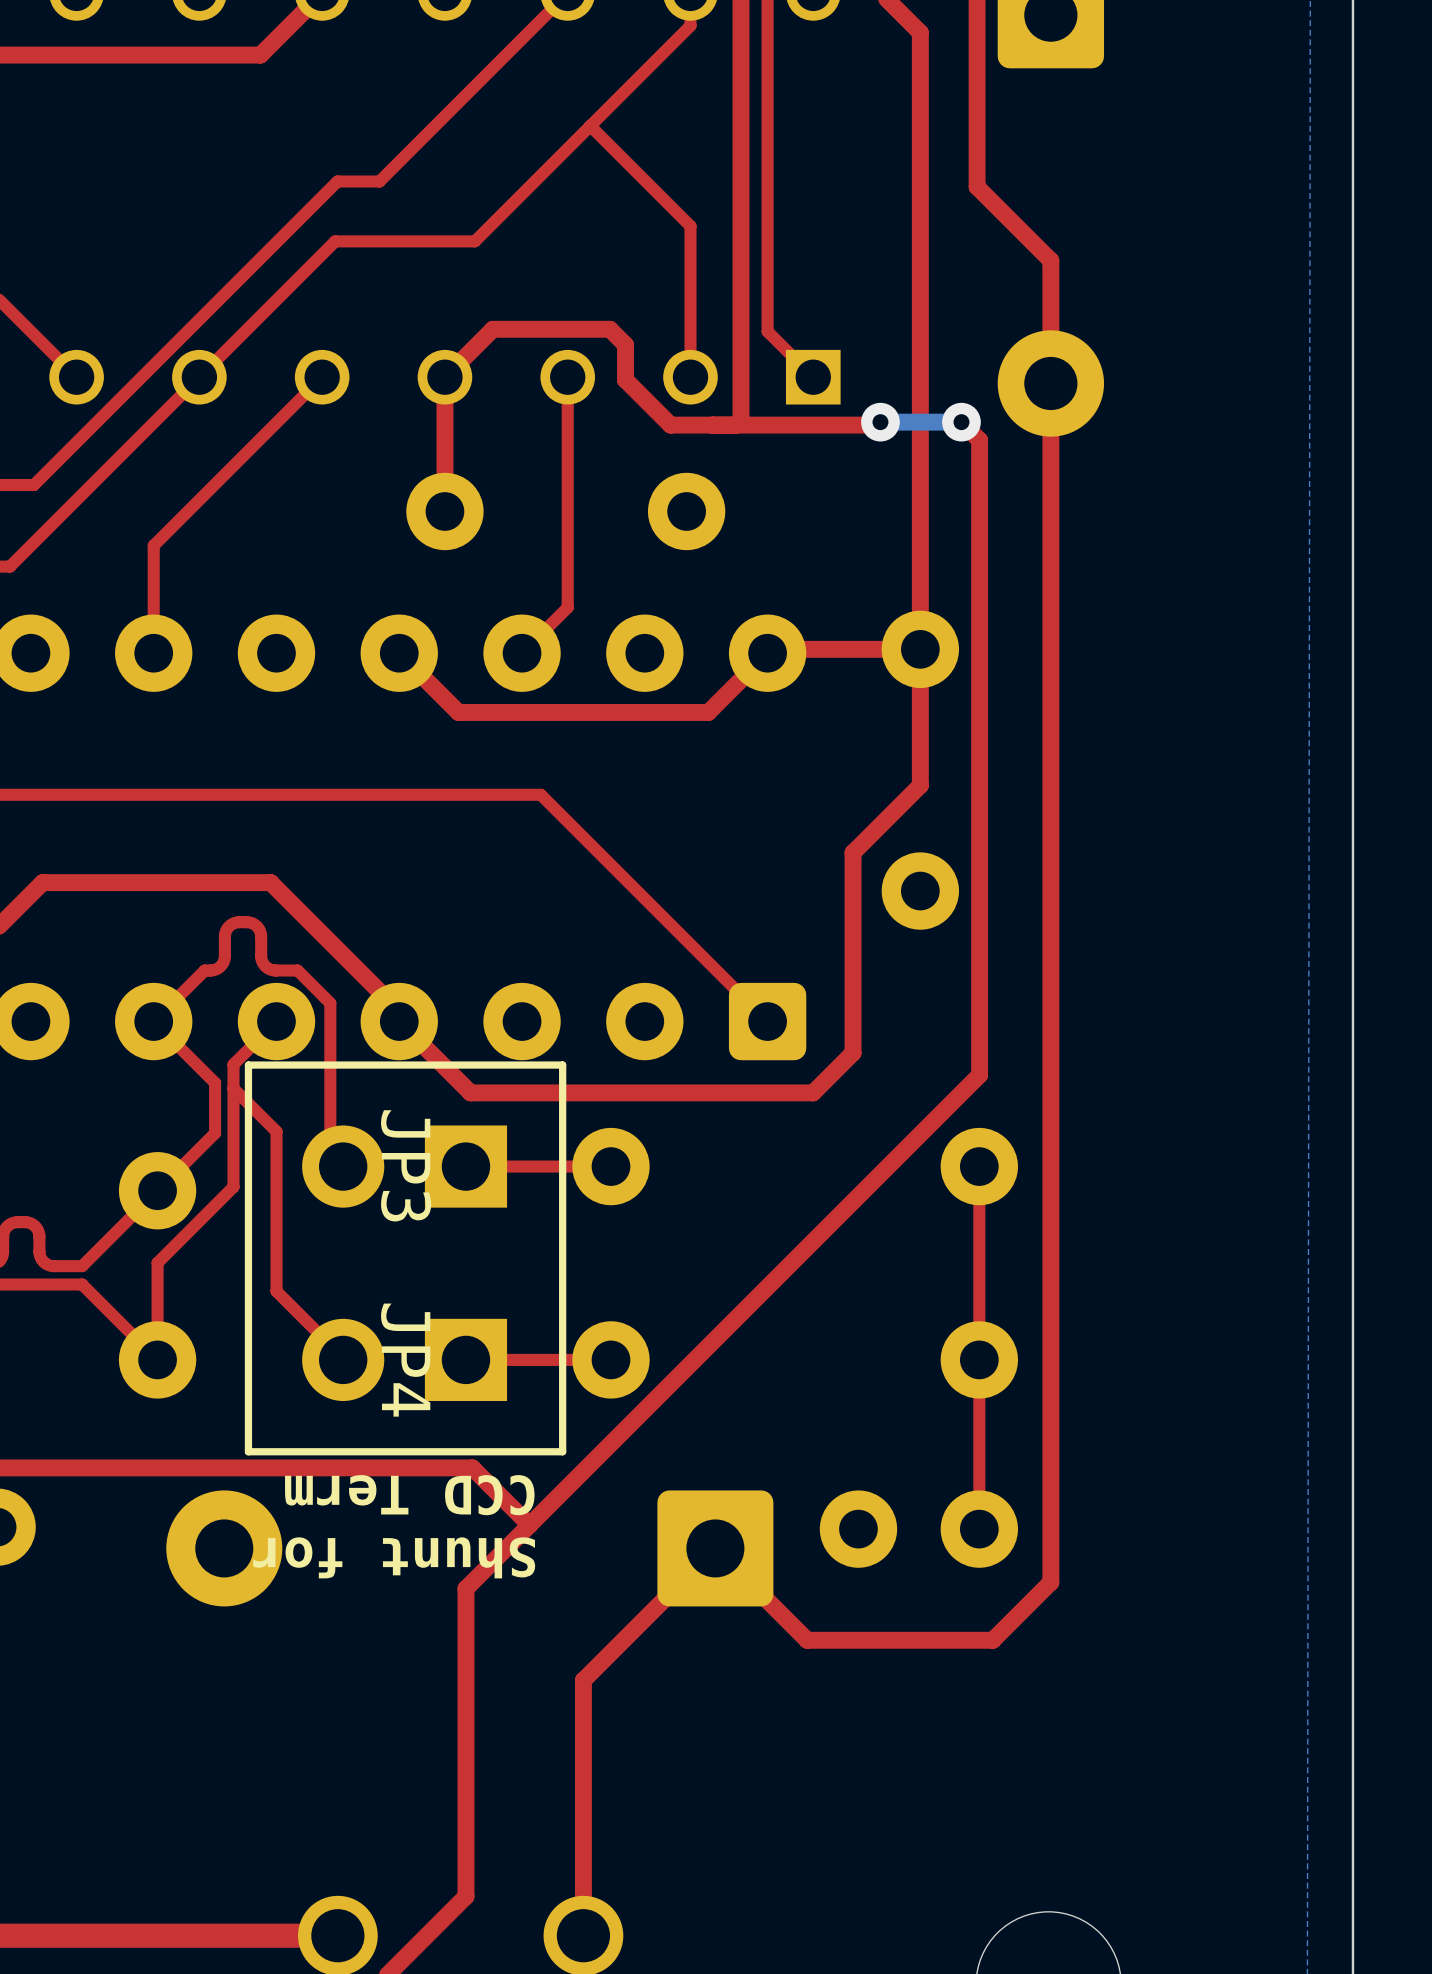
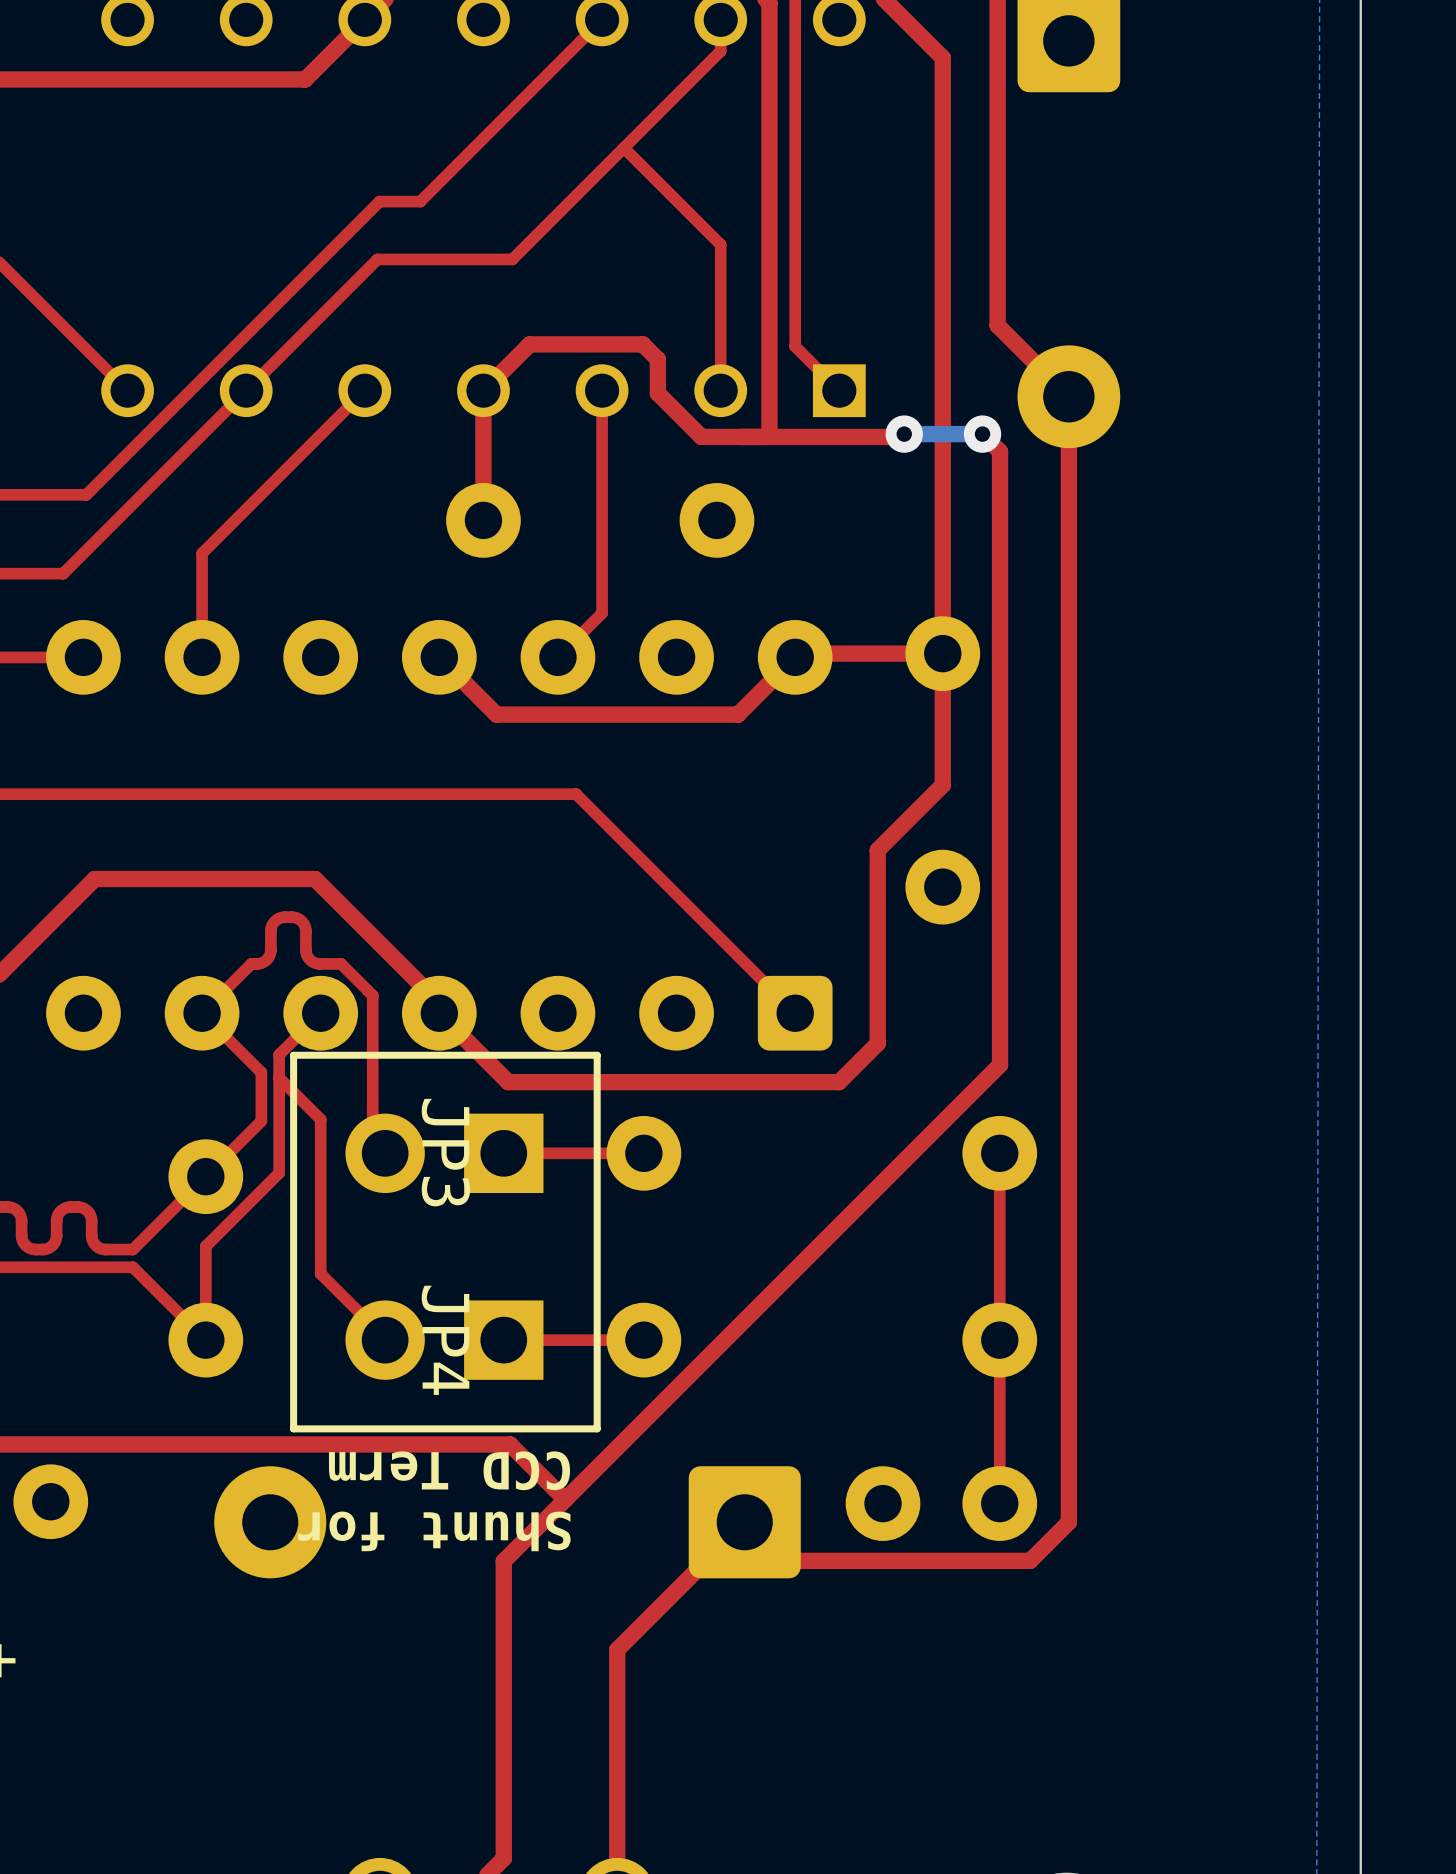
top track: (977, 186) (1050, 260) (1050, 383) -> (997, 206) (997, 325) (1068, 396)
top track: (1050, 1548) (1050, 1582) (992, 1640) (807, 1640) (715, 1548) -> (1068, 1522) (1030, 1560) (783, 1560)

